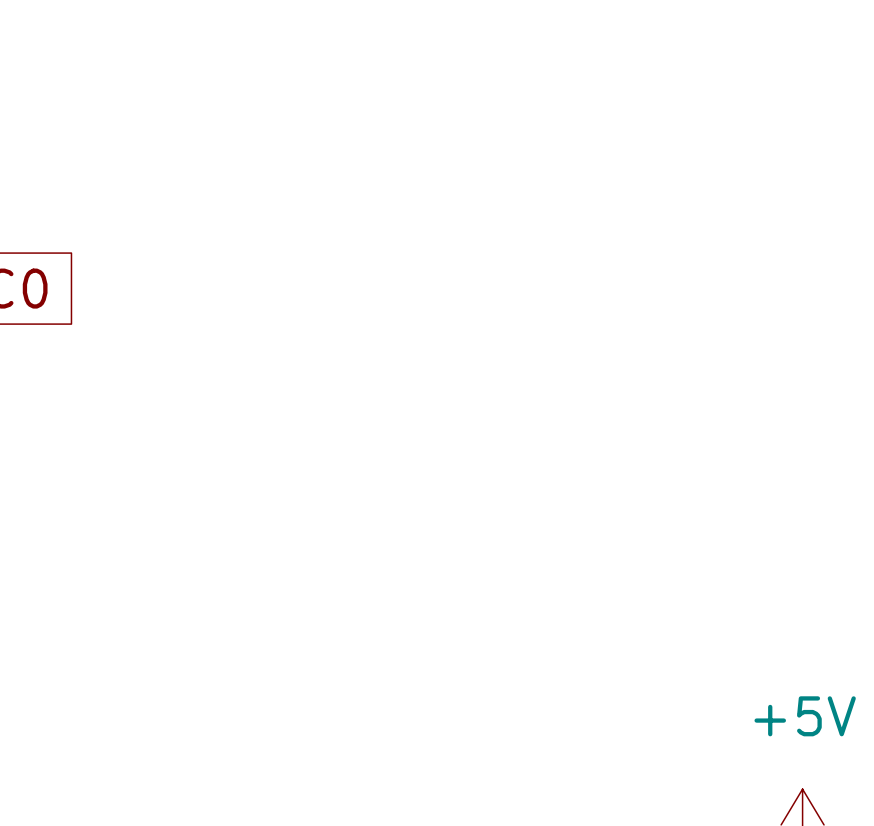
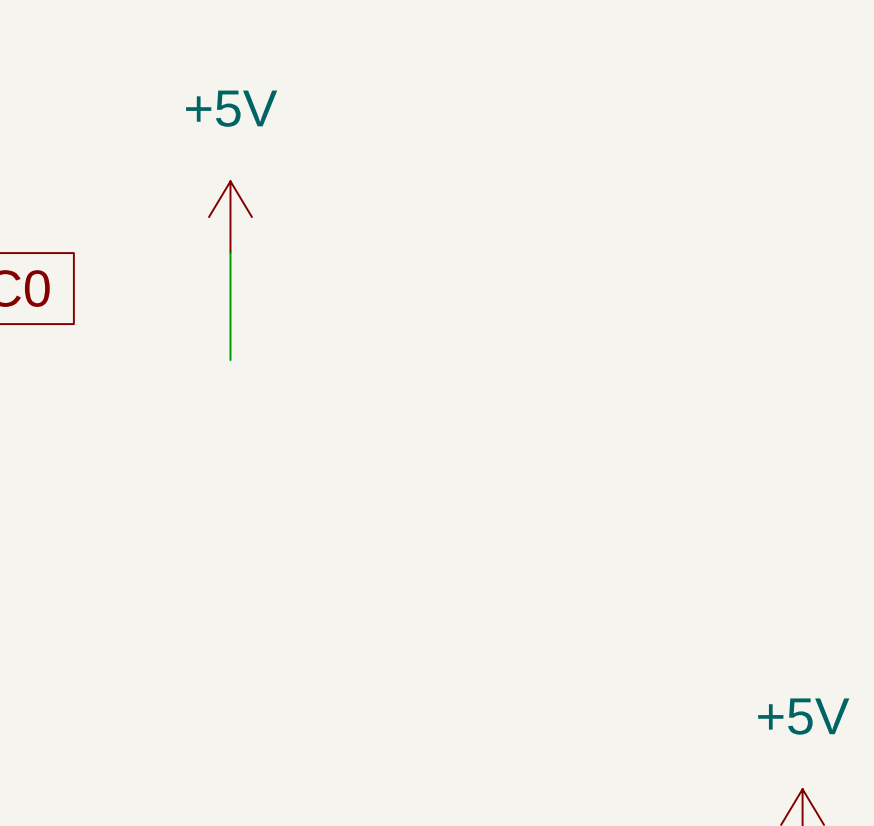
power symbol: none -> +5V (230, 217)
wire: none -> (230, 252) (230, 360)

